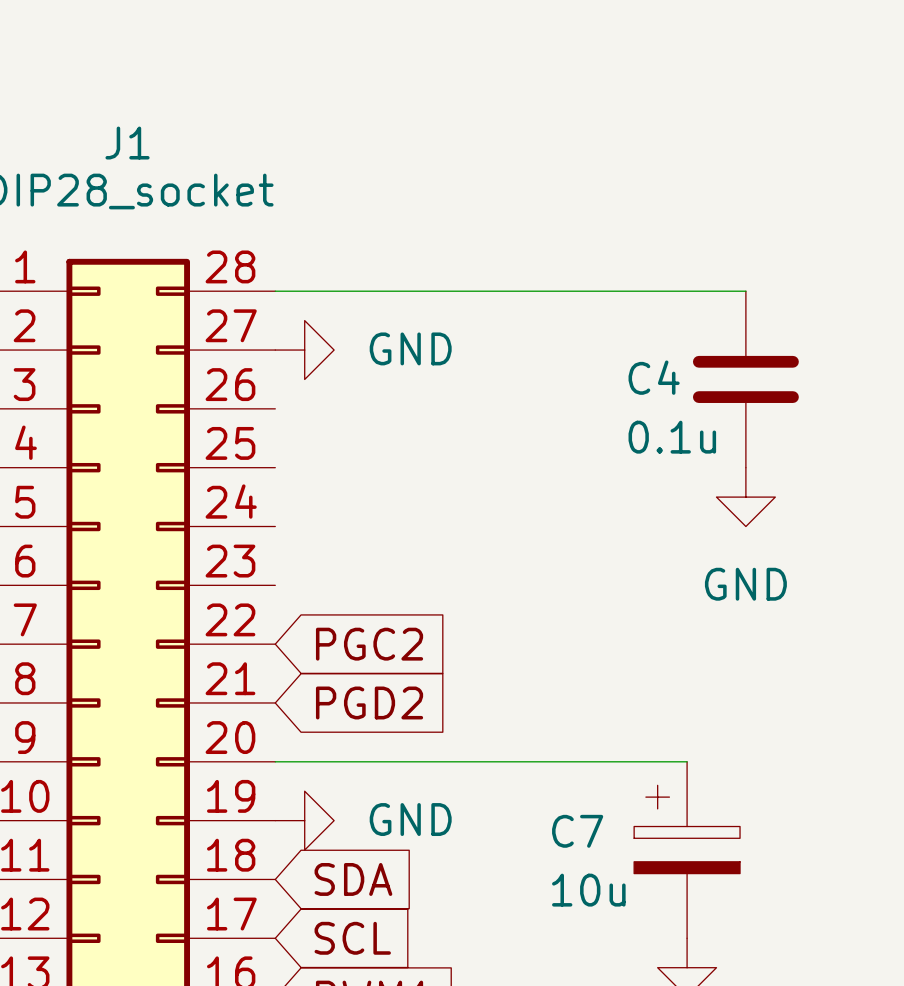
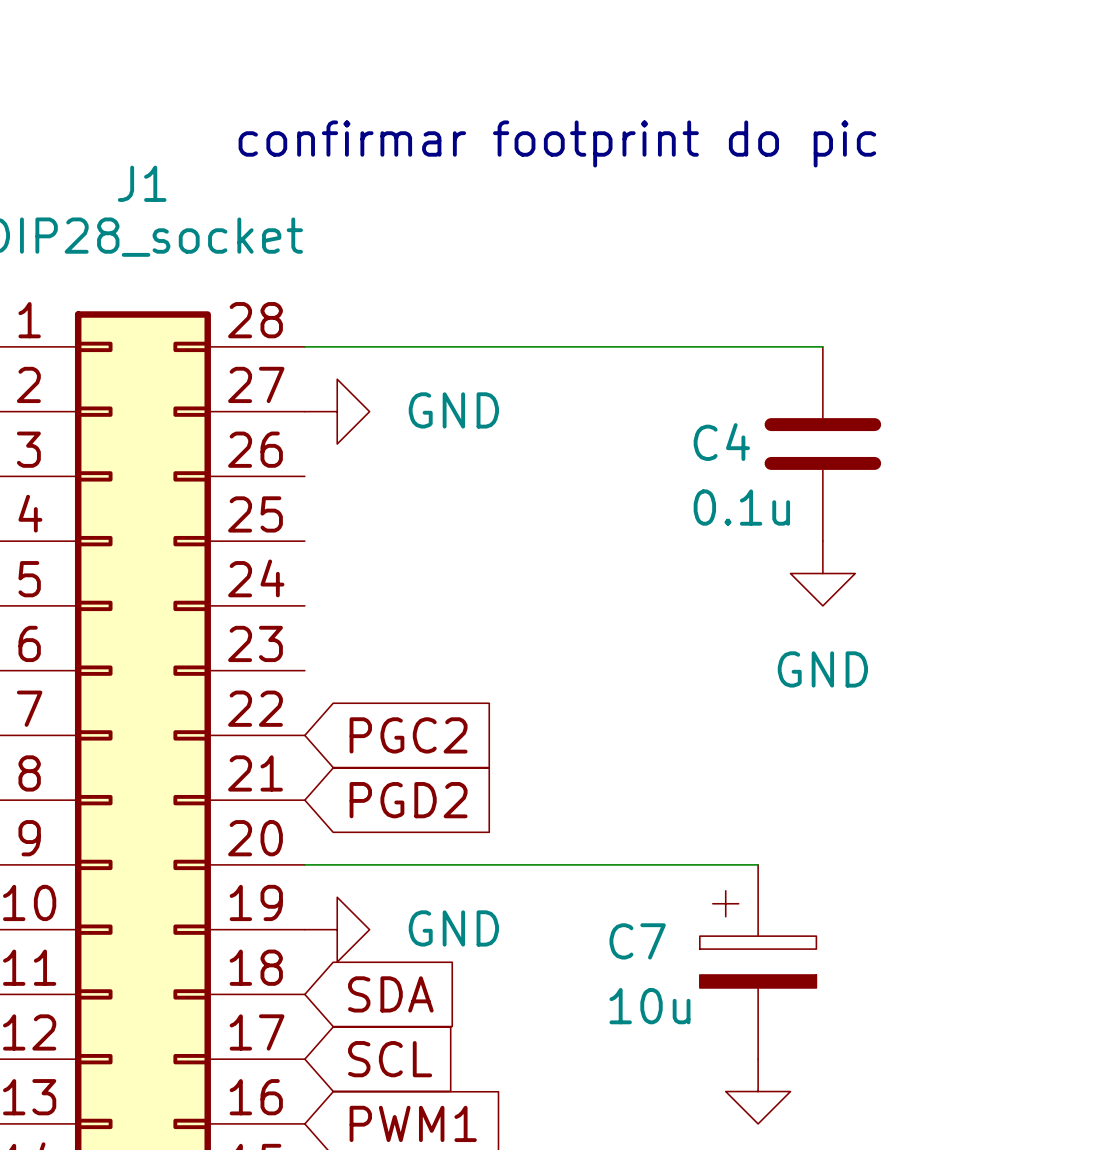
text: none -> confirmar footprint do pic (557, 143)

